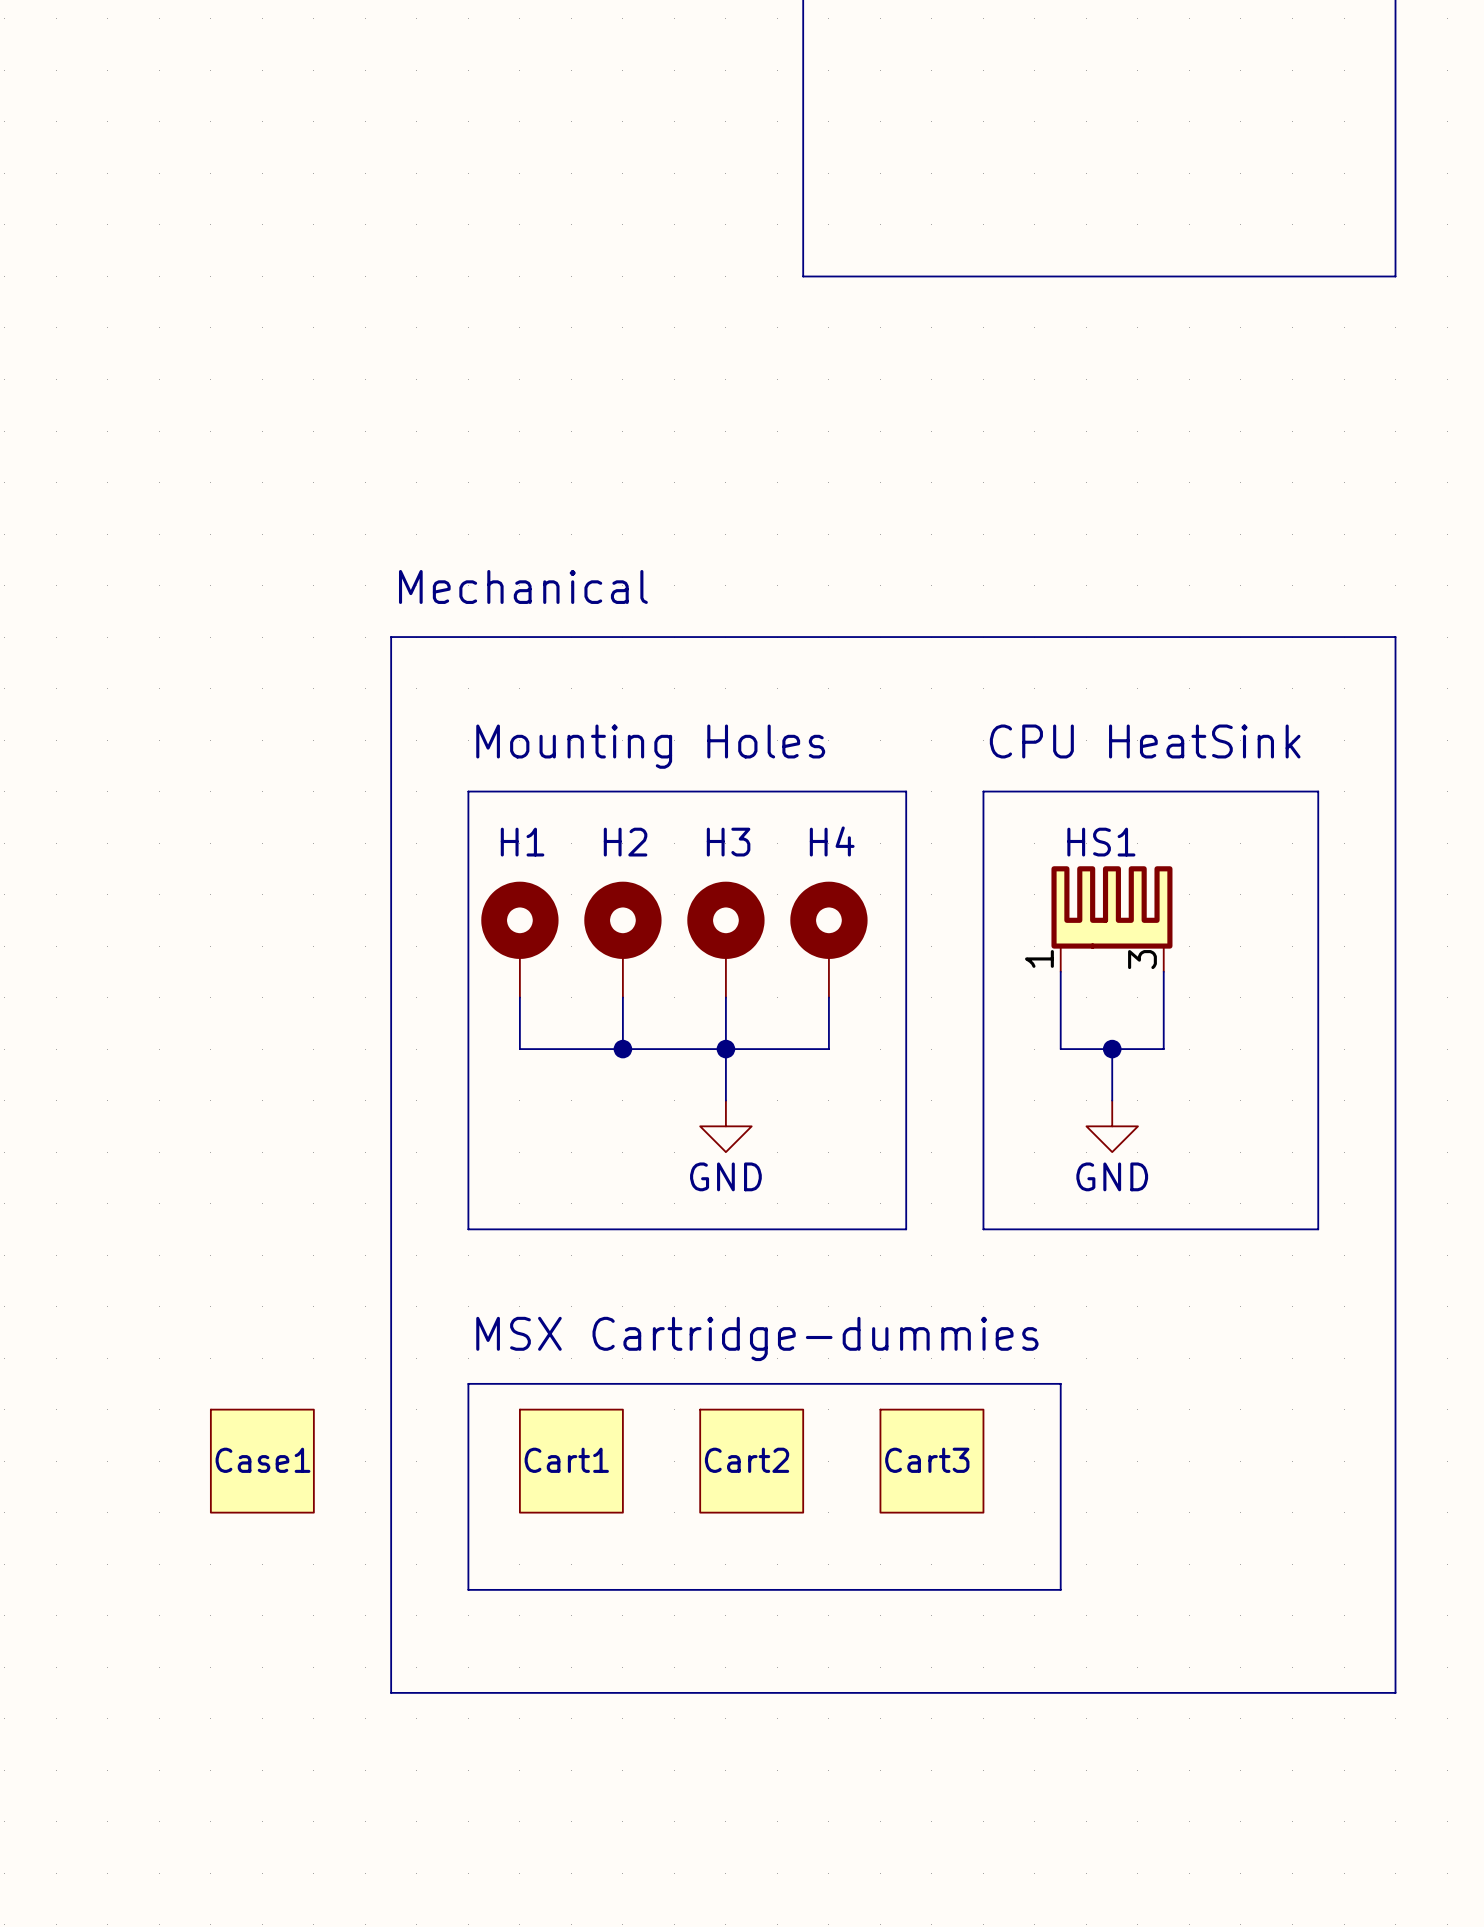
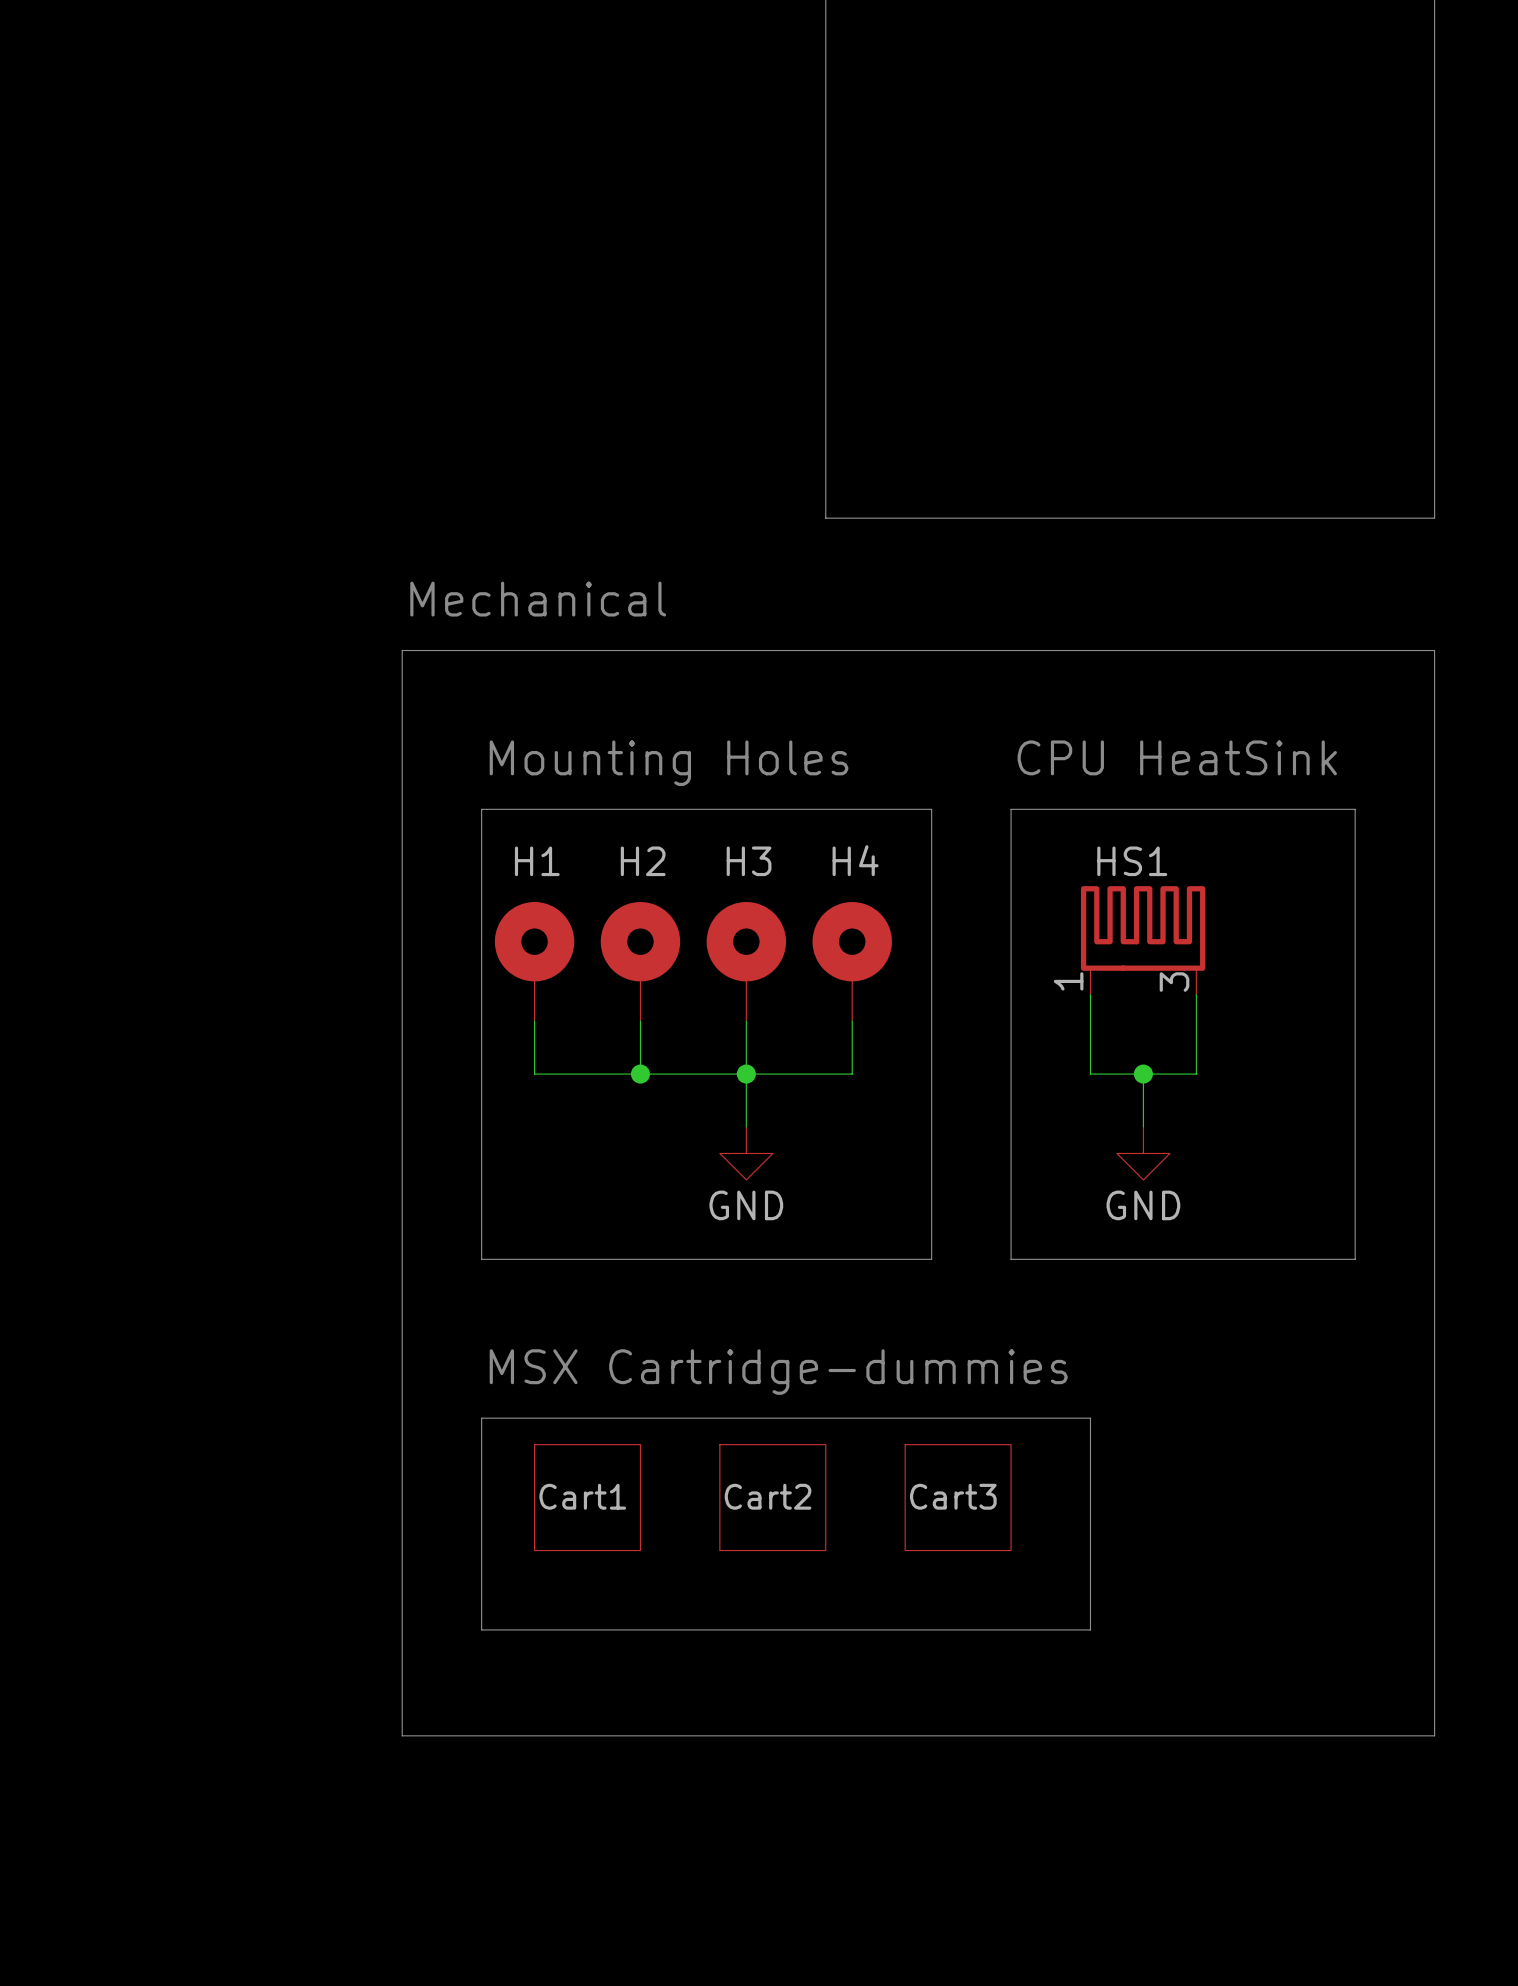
line: (803, 276) (1395, 276) -> (825, 279) (825, 518) (1434, 518) (1434, 279)
Case1: (262, 1461) -> none

